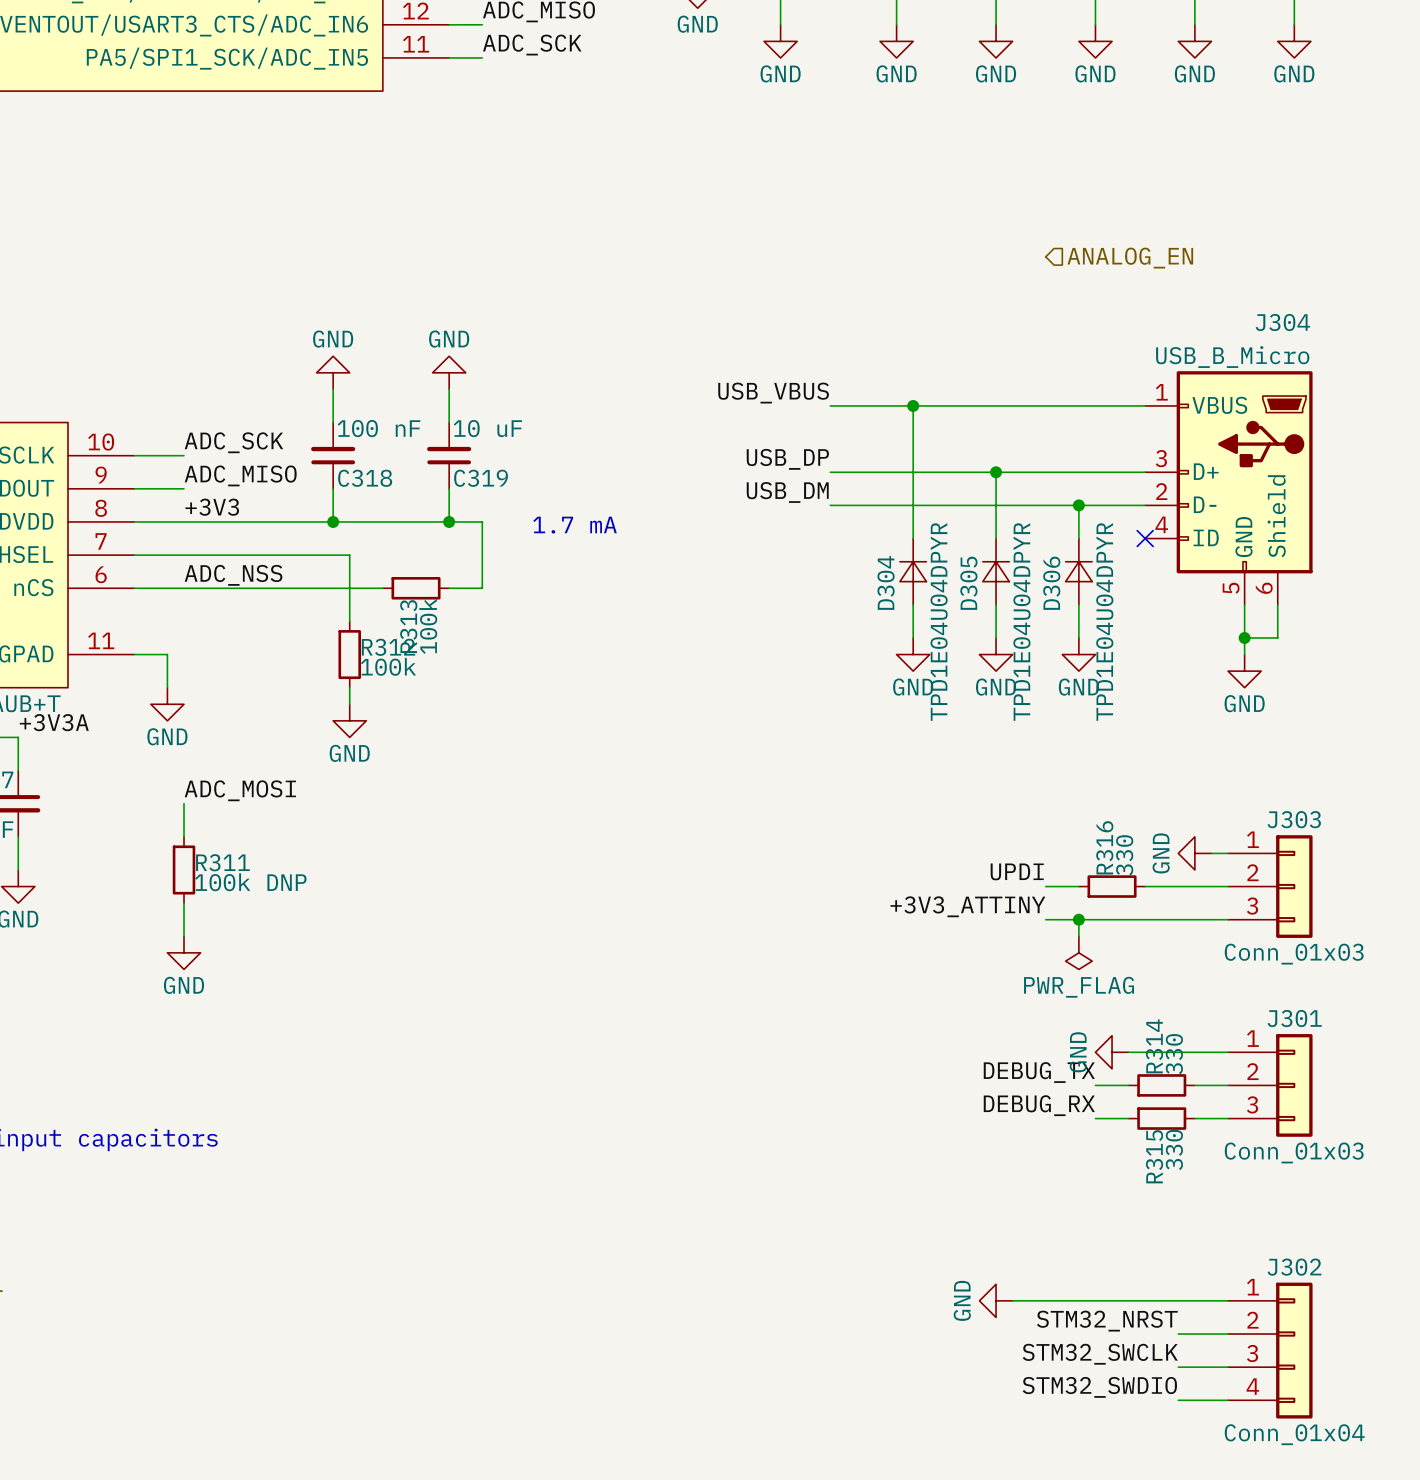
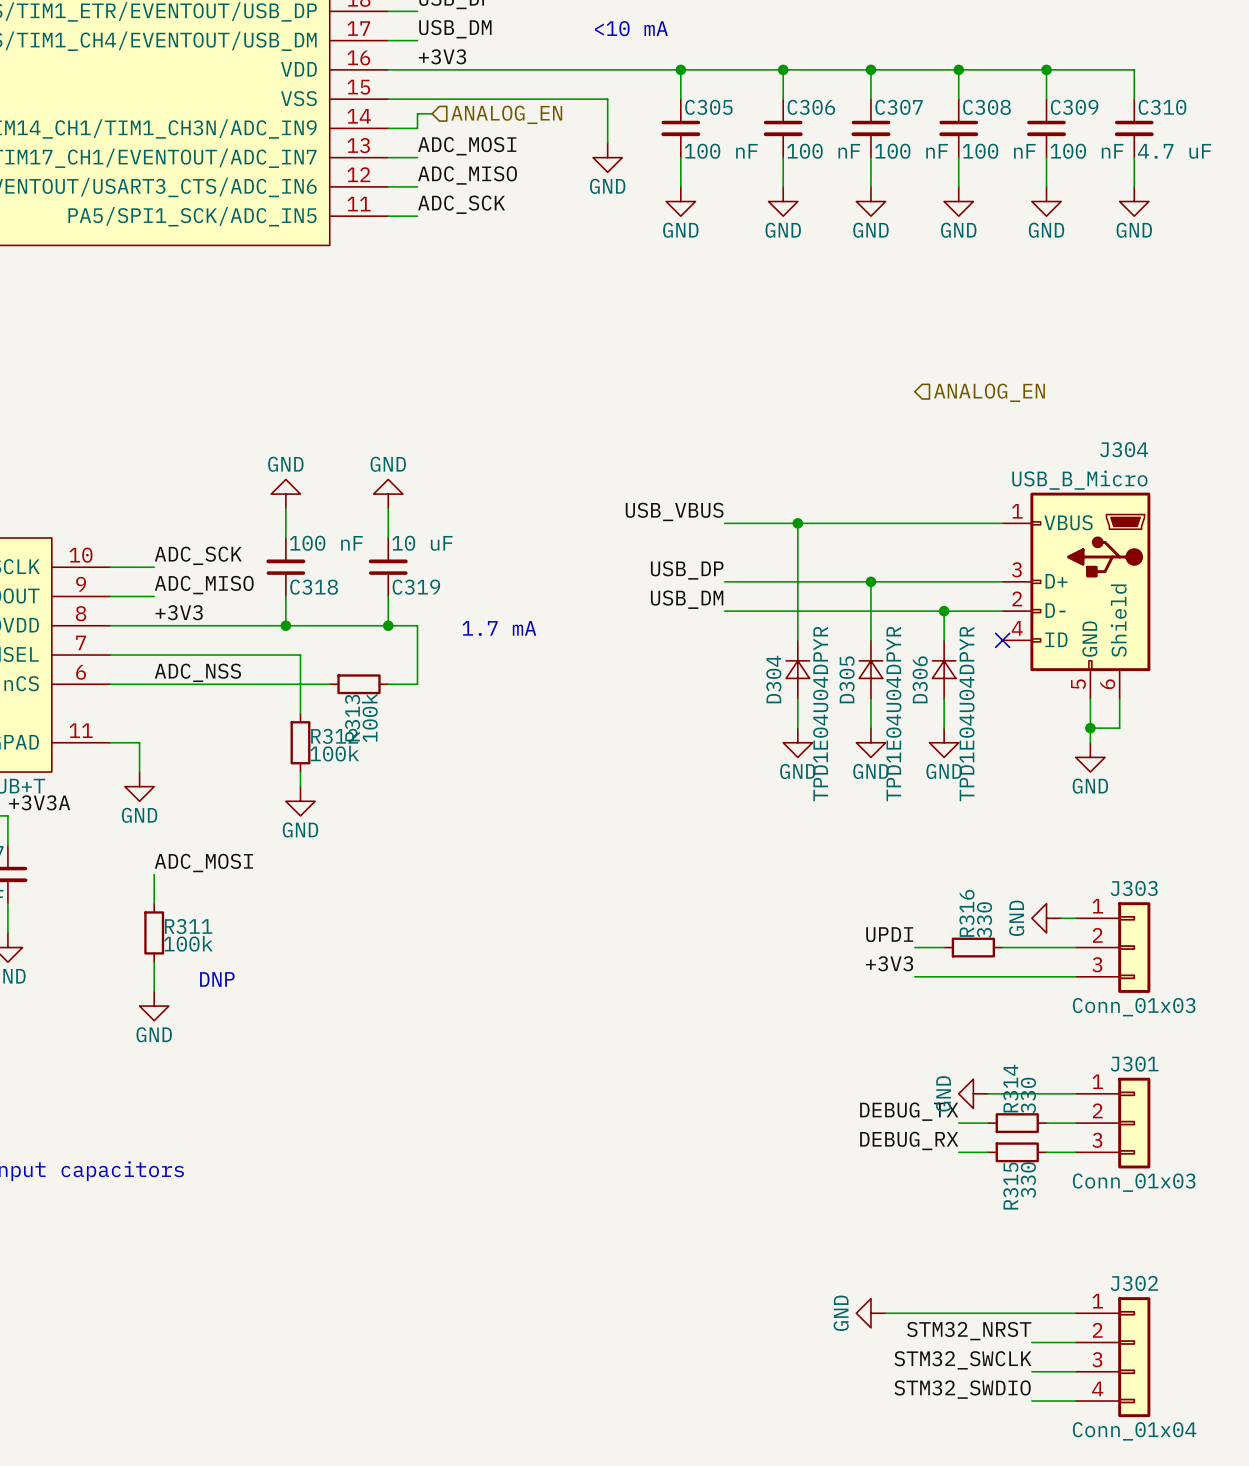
R311 value: 100k DNP (250, 882) -> 100k (188, 943)
label: +3V3_ATTINY (967, 906) -> +3V3 (889, 963)
wire: (1078, 919) (1078, 936) -> none
junction: (1078, 919) -> none
text: none -> DNP (217, 979)
power symbol: PWR_FLAG (1078, 952) -> none

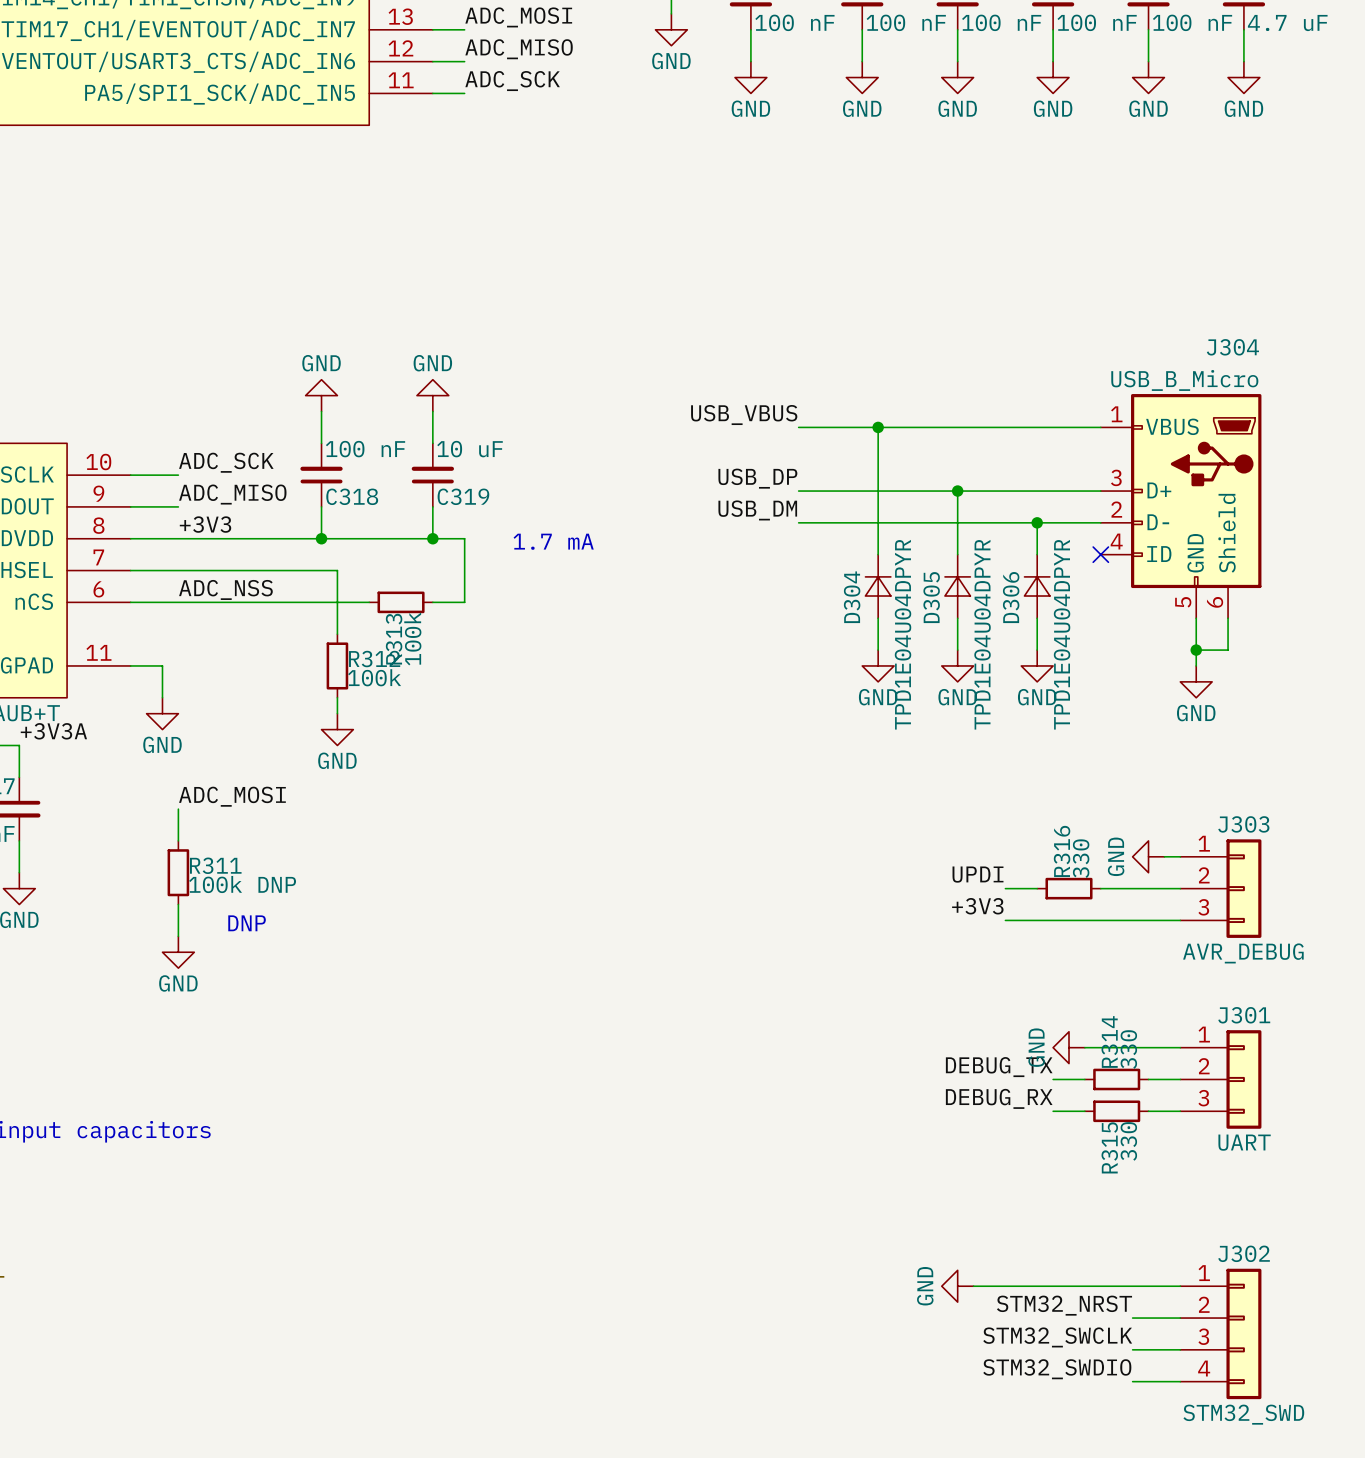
hierarchical label: ANALOG_EN (989, 392) -> none
R311 value: 100k (188, 943) -> 100k DNP (242, 884)
J303 value: Conn_01x03 (1134, 1007) -> AVR_DEBUG (1243, 953)
J301 value: Conn_01x03 (1134, 1182) -> UART (1244, 1142)
J302 value: Conn_01x04 (1134, 1431) -> STM32_SWD (1243, 1414)

